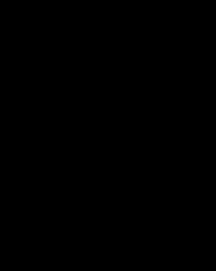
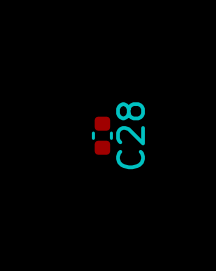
C28: none -> (102, 135)

